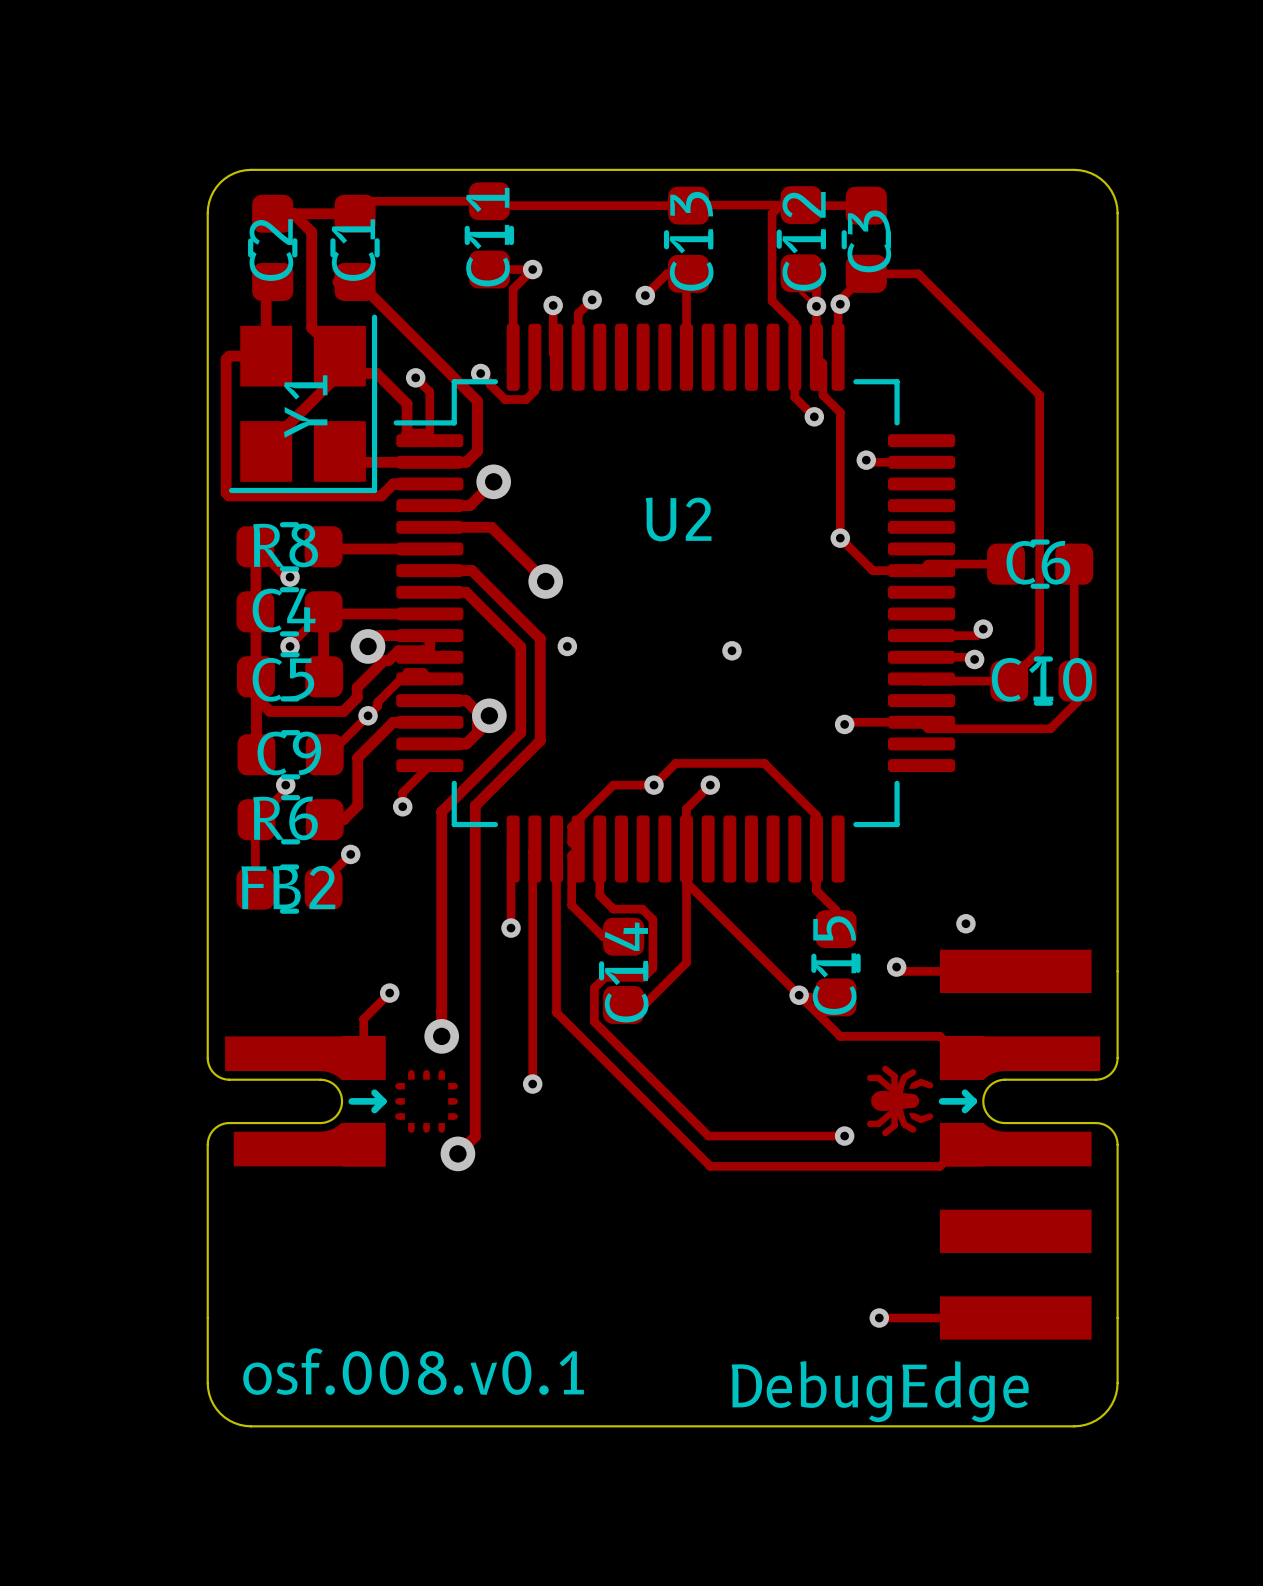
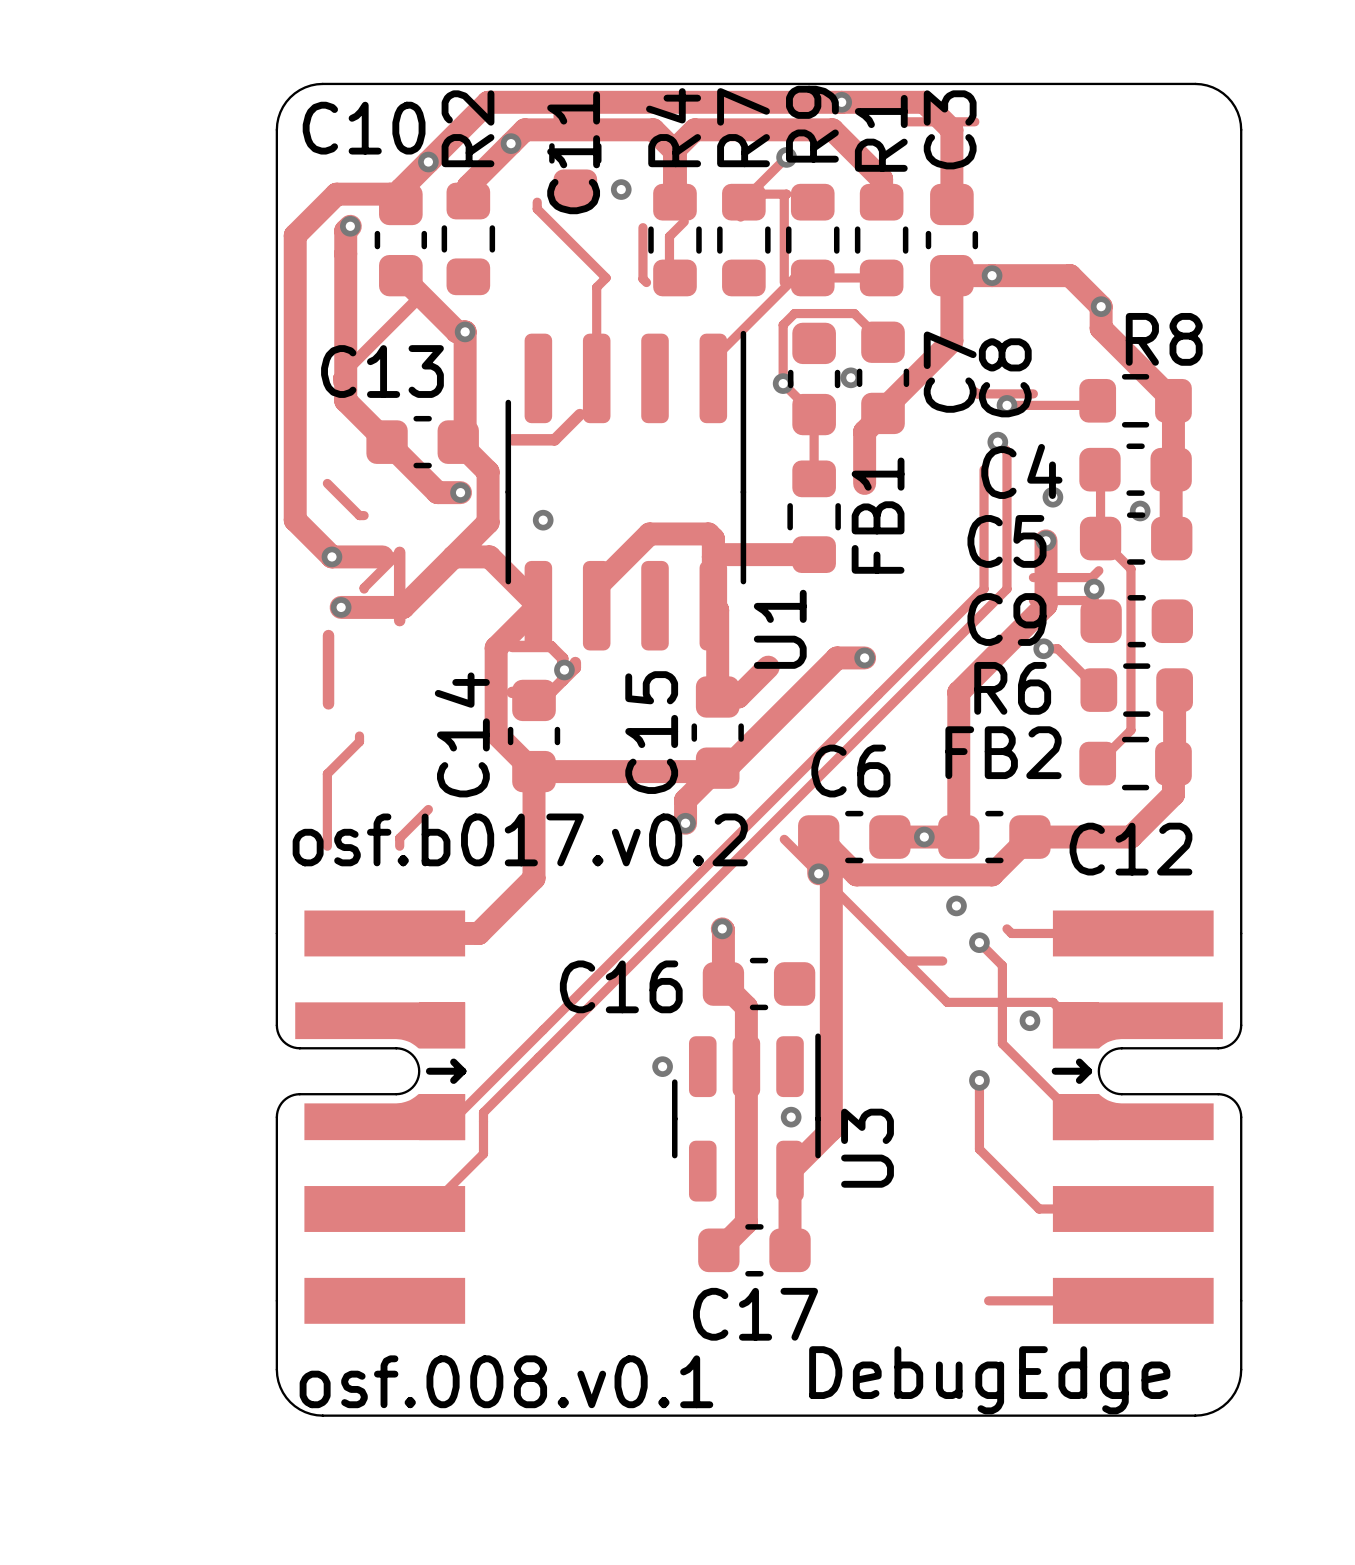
C13 footprint: [663, 186, 714, 293] -> [366, 415, 479, 469]
C12 footprint: [776, 186, 827, 293] -> [938, 810, 1051, 864]
C3 footprint: [841, 186, 891, 293] -> [925, 183, 979, 297]
via: none -> (841, 102)
track: (688, 205) (493, 205) (489, 201) (367, 201) (355, 213) -> none
track: (689, 205) (801, 205) -> none
track: (780, 205) (772, 213) (772, 300) (794, 323) (794, 397) (814, 416) -> none
track: (272, 213) (337, 213) -> none
track: (293, 213) (311, 232) (311, 328) (339, 356) (339, 373) (376, 373) (407, 403) (407, 434) (423, 434) (429, 440) (429, 391) (415, 377) -> none
via: none -> (511, 143)
track: none -> (674, 151) (653, 129) (524, 129) (468, 186) (468, 201)
track: none -> (786, 157) (743, 202)
via: none -> (786, 157)
C12 name position: C12 (804, 241) -> C12 (1130, 849)
C3 name position: C3 (869, 241) -> C3 (950, 129)
via: none -> (428, 162)
C2: (272, 247) -> none
C1: (355, 247) -> none
track: (489, 269) (532, 269) (513, 289) (513, 357) -> none
track: (272, 281) (266, 288) (266, 356) (229, 356) (226, 359) (226, 493) (228, 495) (381, 495) (393, 483) (429, 483) -> none
track: (337, 281) (358, 281) (477, 401) (477, 451) (466, 462) (350, 462) (339, 451) -> none
track: none -> (537, 202) (537, 209) (606, 277) (596, 287) (596, 378)
track: none -> (674, 202) (674, 149) (694, 129) (832, 129) (881, 178) (881, 202)
track: none -> (951, 204) (951, 129) (924, 102) (488, 102) (400, 189) (400, 204) (390, 194) (336, 194) (295, 235) (295, 520) (331, 556) (382, 556)
via: (645, 295) -> none
via: (592, 299) -> none
track: none -> (350, 226) (345, 230) (345, 400) (437, 492) (460, 492)
via: none -> (350, 226)
via: (840, 304) -> none
via: (553, 305) -> none
track: (816, 306) (815, 306) (801, 292) (801, 273) (816, 288) (816, 357) (822, 363) (822, 395) (840, 412) (840, 538) (872, 570) (921, 570) (928, 564) (1006, 564) -> none
via: (816, 306) -> none
R2: none -> (468, 238)
R4: none -> (674, 240)
R7: none -> (743, 240)
R9: none -> (812, 240)
R1: none -> (881, 240)
track: none -> (400, 275) (457, 331) (465, 331) (465, 435) (458, 442) (488, 471) (488, 522) (403, 607) (341, 607)
via: none -> (992, 275)
track: none -> (881, 277) (794, 277) (713, 359) (713, 378)
track: (534, 357) (534, 390) (526, 399) (505, 399) (480, 373) -> none
track: (838, 357) (838, 306) (840, 299) (866, 273) (918, 273) (1039, 395) (1039, 650) (1009, 681) (923, 681) (921, 678) -> none
via: (480, 373) -> none
via position: (415, 377) -> (465, 331)
via: none -> (1101, 306)
Y1: (303, 403) -> none
track: none -> (883, 342) (854, 313) (794, 313) (783, 324) (783, 383) (814, 414) (814, 478)
via: (814, 416) -> none
via: none -> (850, 377)
C8: none -> (883, 377)
C7: none -> (814, 378)
via: none -> (783, 383)
via: (866, 460) -> none
track: none -> (1097, 400) (1093, 405) (1006, 405)
via: none -> (1006, 405)
via: (493, 481) -> none
track: none -> (997, 442) (1006, 451) (1006, 589) (483, 1112) (483, 1153) (428, 1209) (384, 1209)
via: none -> (997, 442)
R8 footprint: [236, 522, 343, 572] -> [1079, 374, 1192, 428]
track: (429, 527) (491, 527) (545, 581) -> none
track: none -> (984, 469) (984, 589) (455, 1117) (442, 1117)
track: none -> (1100, 470) (1100, 538) (1130, 568) (1130, 730) (1097, 763)
via: (840, 538) -> none
C6 footprint: [987, 539, 1094, 589] -> [798, 810, 911, 864]
track: (323, 546) (325, 548) (425, 548) -> none
track: none -> (864, 483) (864, 431) (883, 413) (883, 409) (951, 341) (951, 275) (1070, 275) (1101, 306) (1101, 328) (1173, 400) (1171, 537)
track: (255, 547) (255, 697) (270, 711) (343, 711) (357, 697) (357, 687) (384, 660) (388, 660) (398, 650) (423, 650) (429, 657) (429, 635) (378, 635) (368, 646) -> none
U1: none -> (625, 490)
via: none -> (460, 492)
via: none -> (1052, 497)
track: (1074, 564) (1074, 677) (1077, 681) (1077, 701) (1050, 728) (928, 728) (921, 722) (846, 722) (844, 724) -> none
track: (429, 570) (472, 570) (540, 638) (540, 740) (475, 805) (475, 1136) (457, 1153) -> none
via: none -> (1140, 511)
via: (290, 577) -> none
FB1: none -> (814, 516)
via: none -> (543, 520)
via: (545, 581) -> none
C4 footprint: [236, 587, 343, 637] -> [1079, 443, 1192, 496]
track: (429, 592) (466, 592) (520, 646) (520, 732) (441, 811) (441, 1036) -> none
track: none -> (1046, 540) (1046, 605) (958, 692) (958, 837) (889, 837)
via: none -> (1046, 540)
U2: (674, 603) -> none
C4 name position: C4 (284, 610) -> C4 (1021, 471)
track: (323, 611) (325, 613) (425, 613) -> none
track: none -> (814, 554) (715, 554) (713, 556)
via: none -> (331, 556)
track: none -> (453, 556) (489, 556) (538, 605) (496, 647) (496, 733) (534, 771)
via: (983, 629) -> none
track: none -> (596, 586) (649, 533) (708, 533) (713, 538) (713, 605) (717, 610) (717, 696) (738, 696) (768, 667)
via: (290, 646) -> none
via: (368, 646) -> none
via: (567, 646) -> none
via: none -> (1094, 589)
via: (731, 650) -> none
C5 footprint: [236, 652, 344, 702] -> [1079, 512, 1193, 565]
C10 footprint: [990, 656, 1097, 706] -> [374, 183, 428, 297]
via: (974, 659) -> none
via: none -> (341, 607)
track: (429, 678) (423, 672) (407, 672) (377, 702) (377, 706) (329, 754) (324, 754) -> none
C5 name position: C5 (283, 679) -> C5 (1006, 541)
C10 name position: C10 (1041, 679) -> C10 (364, 128)
via size: [472, 698, 507, 734] -> [554, 659, 575, 681]
track: none -> (1043, 648) (1057, 648) (1098, 690)
via: none -> (1043, 648)
track: none -> (864, 657) (837, 657) (726, 768) (717, 768) (685, 800) (685, 823)
via: none -> (864, 657)
via: (368, 715) -> none
track: (429, 722) (393, 722) (357, 757) (357, 805) (343, 819) (324, 819) -> none
via: (844, 724) -> none
C9 footprint: [237, 730, 344, 780] -> [1080, 595, 1193, 648]
track: none -> (1174, 690) (1173, 794) (1130, 837) (1029, 837) (992, 874) (856, 874) (818, 837) (818, 873)
C9 name position: C9 (289, 753) -> C9 (1006, 619)
track: (429, 765) (402, 792) (402, 806) -> none
via: (285, 785) -> none
via: (654, 785) -> none
track: (710, 785) (686, 808) (686, 962) (644, 1004) (623, 1004) -> none
via: (710, 785) -> none
R6 footprint: [237, 795, 344, 845] -> [1080, 663, 1193, 717]
via: (402, 806) -> none
R6 name position: R6 (285, 818) -> R6 (1012, 688)
track: none -> (534, 771) (714, 771)
track: none -> (534, 771) (534, 878) (478, 933) (384, 933)
track: (513, 849) (511, 851) (511, 928) -> none
track: (534, 849) (532, 851) (532, 1084) -> none
track: (556, 849) (556, 1012) (710, 1166) (939, 1166) (961, 1144) -> (979, 942) (1002, 965) (1002, 1043) (1075, 1117)
track: (599, 849) (599, 895) (613, 909) (642, 909) (652, 919) (652, 968) (643, 977) (605, 977) (594, 987) (594, 1021) (708, 1136) (844, 1136) -> none
via: (350, 854) -> none
FB2 footprint: [236, 864, 343, 914] -> [1079, 736, 1192, 791]
via: none -> (685, 823)
via: none -> (924, 837)
text: none -> osf.b017.v0.2 (520, 839)
FB2 name position: FB2 (288, 887) -> FB2 (1003, 752)
track: none -> (831, 849) (831, 1129) (790, 1171) (790, 1250)
C15 footprint: [811, 910, 861, 1017] -> [691, 676, 744, 789]
via: none -> (818, 873)
C14 footprint: [598, 917, 649, 1024] -> [507, 679, 561, 793]
via: (965, 923) -> none
via: (511, 928) -> none
track: (835, 929) (835, 910) (816, 890) (816, 815) (764, 763) (675, 763) (654, 785) (613, 785) (571, 826) (571, 842) (578, 849) (571, 855) (571, 905) (603, 936) (623, 936) -> none
via: none -> (956, 905)
part footprint: [866, 949, 1119, 1340] -> [1051, 910, 1243, 1324]
track: none -> (722, 928) (723, 983) (746, 1006) (746, 1222) (718, 1250)
via: none -> (722, 928)
via: (896, 967) -> none
via: none -> (979, 942)
track: (389, 993) (363, 1019) (363, 1058) -> none
via: (389, 993) -> none
via: (799, 995) -> none
C16: none -> (759, 983)
via: (441, 1036) -> none
via: none -> (1029, 1020)
via position: (532, 1084) -> (662, 1066)
part: (332, 1101) -> none
track: none -> (979, 1080) (979, 1149) (1039, 1209) (1133, 1209)
via position: (844, 1136) -> (979, 1080)
part: none -> (371, 1117)
via: none -> (791, 1117)
U3: none -> (746, 1117)
via: (457, 1153) -> none
C17: none -> (754, 1250)
via: (879, 1318) -> none
text position: osf.008.v0.1 (413, 1371) -> osf.008.v0.1 (506, 1381)

